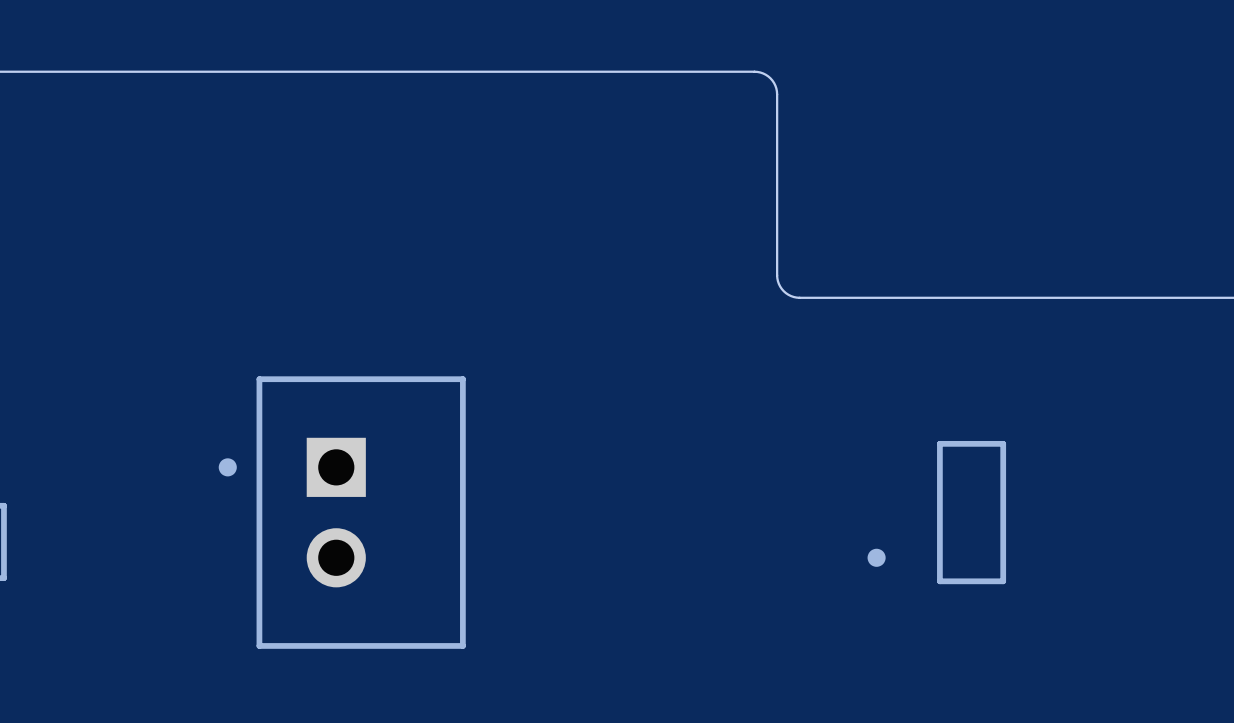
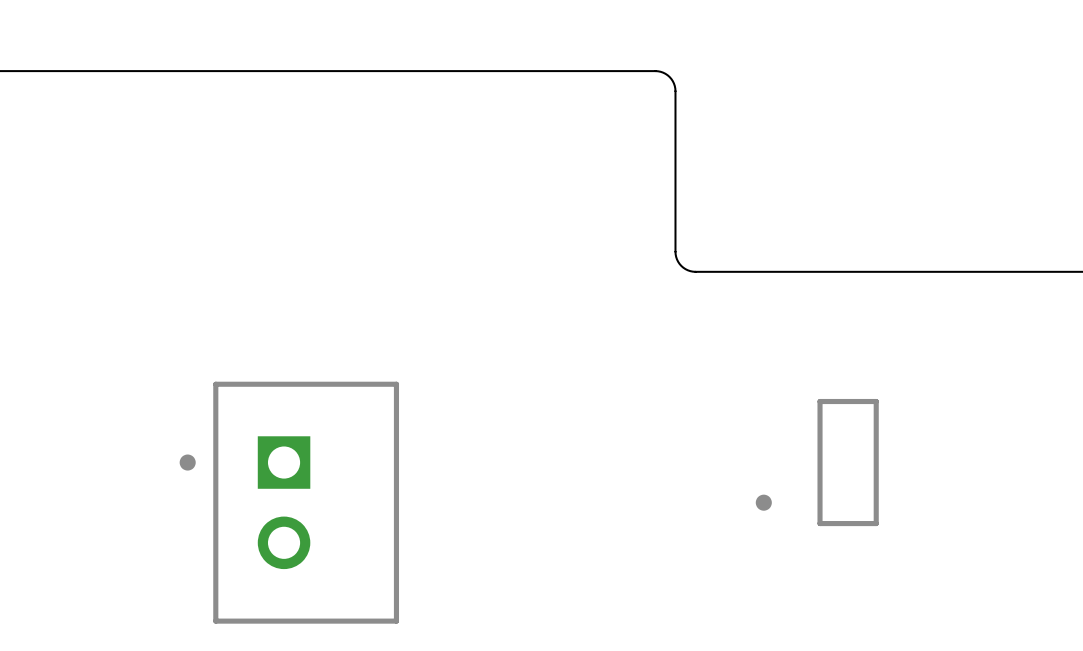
part position: (342, 512) -> (289, 502)

